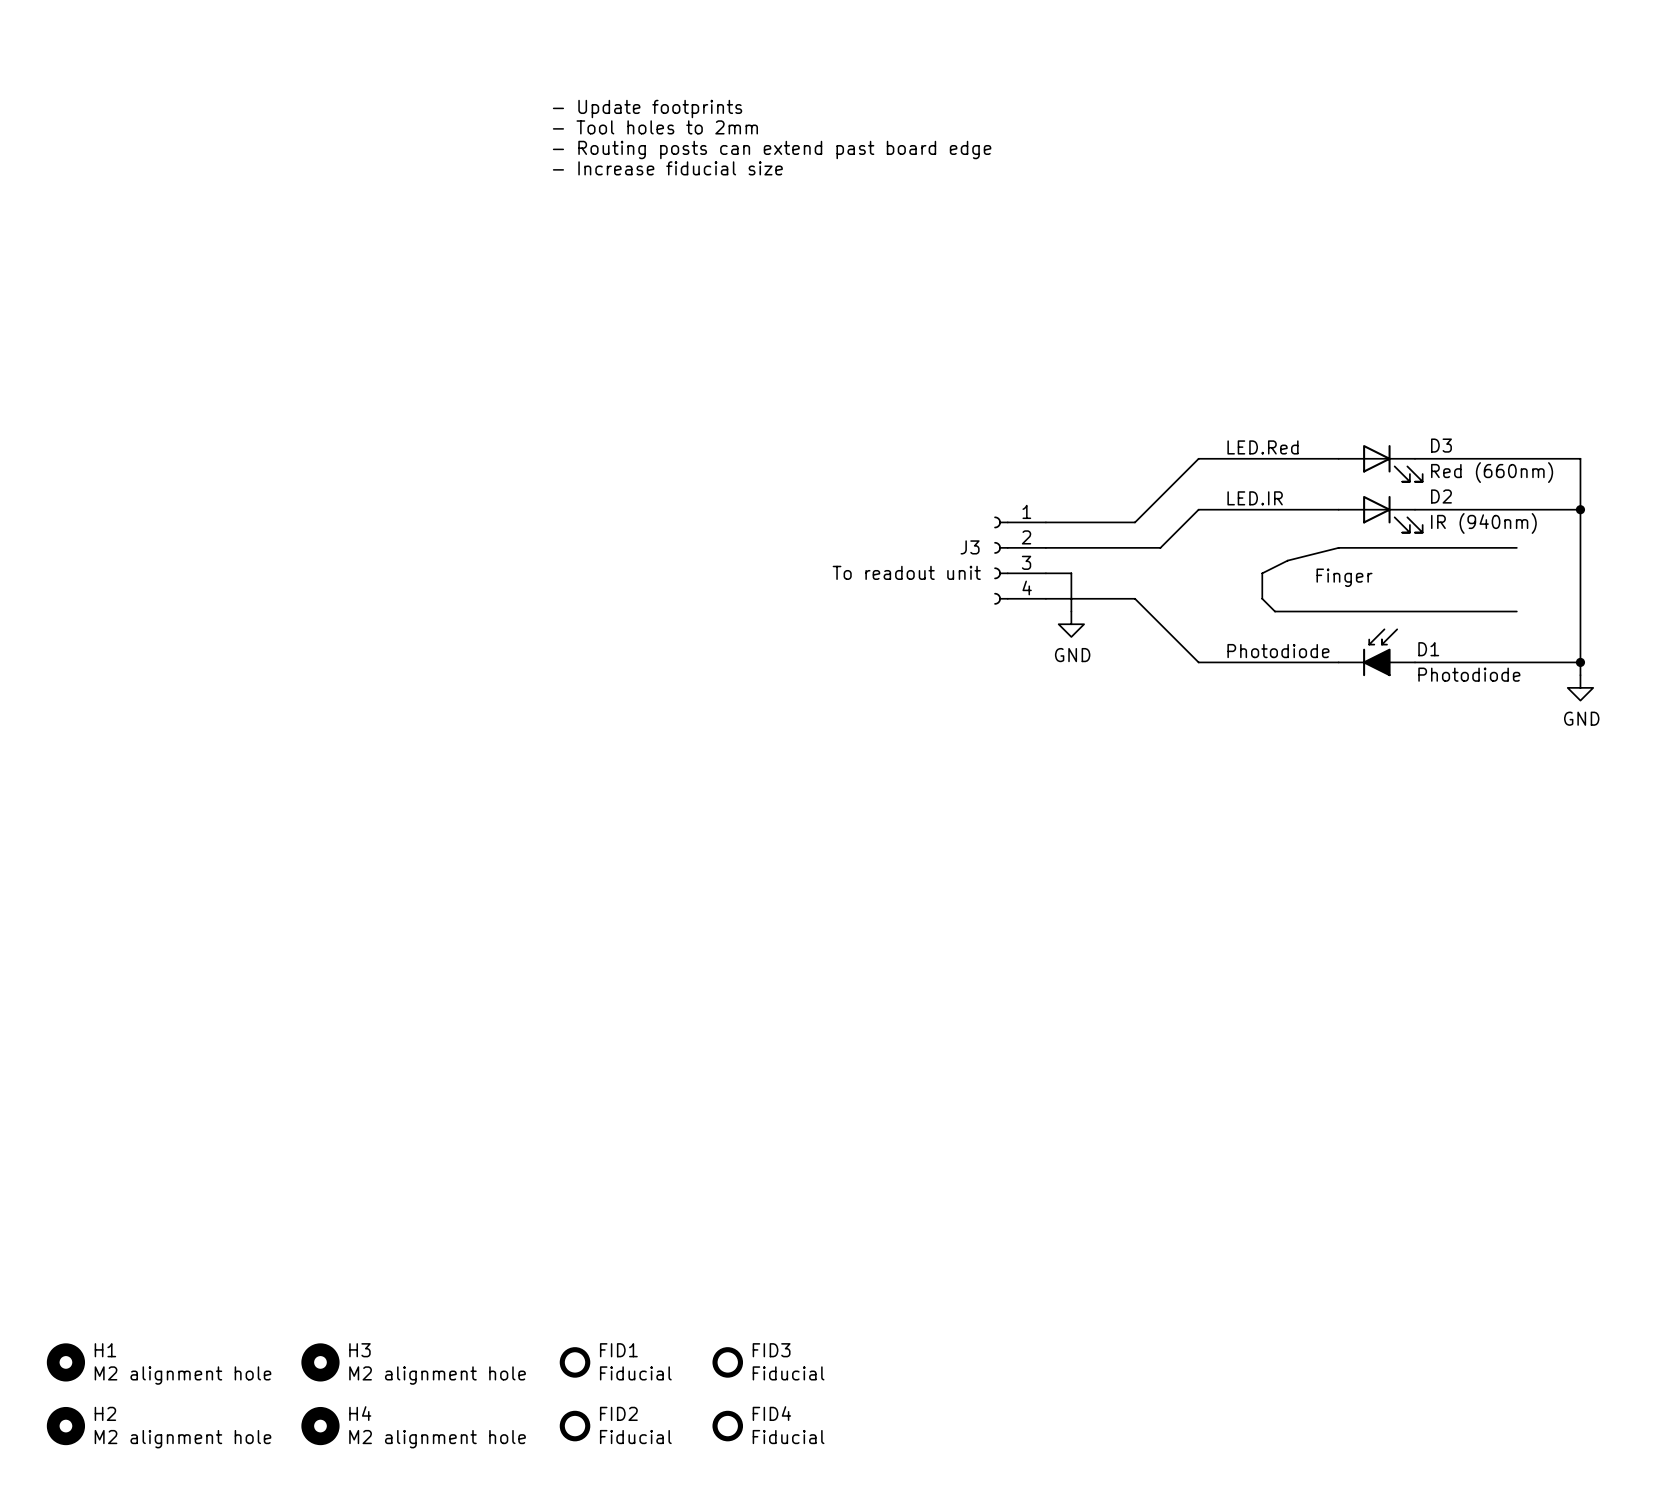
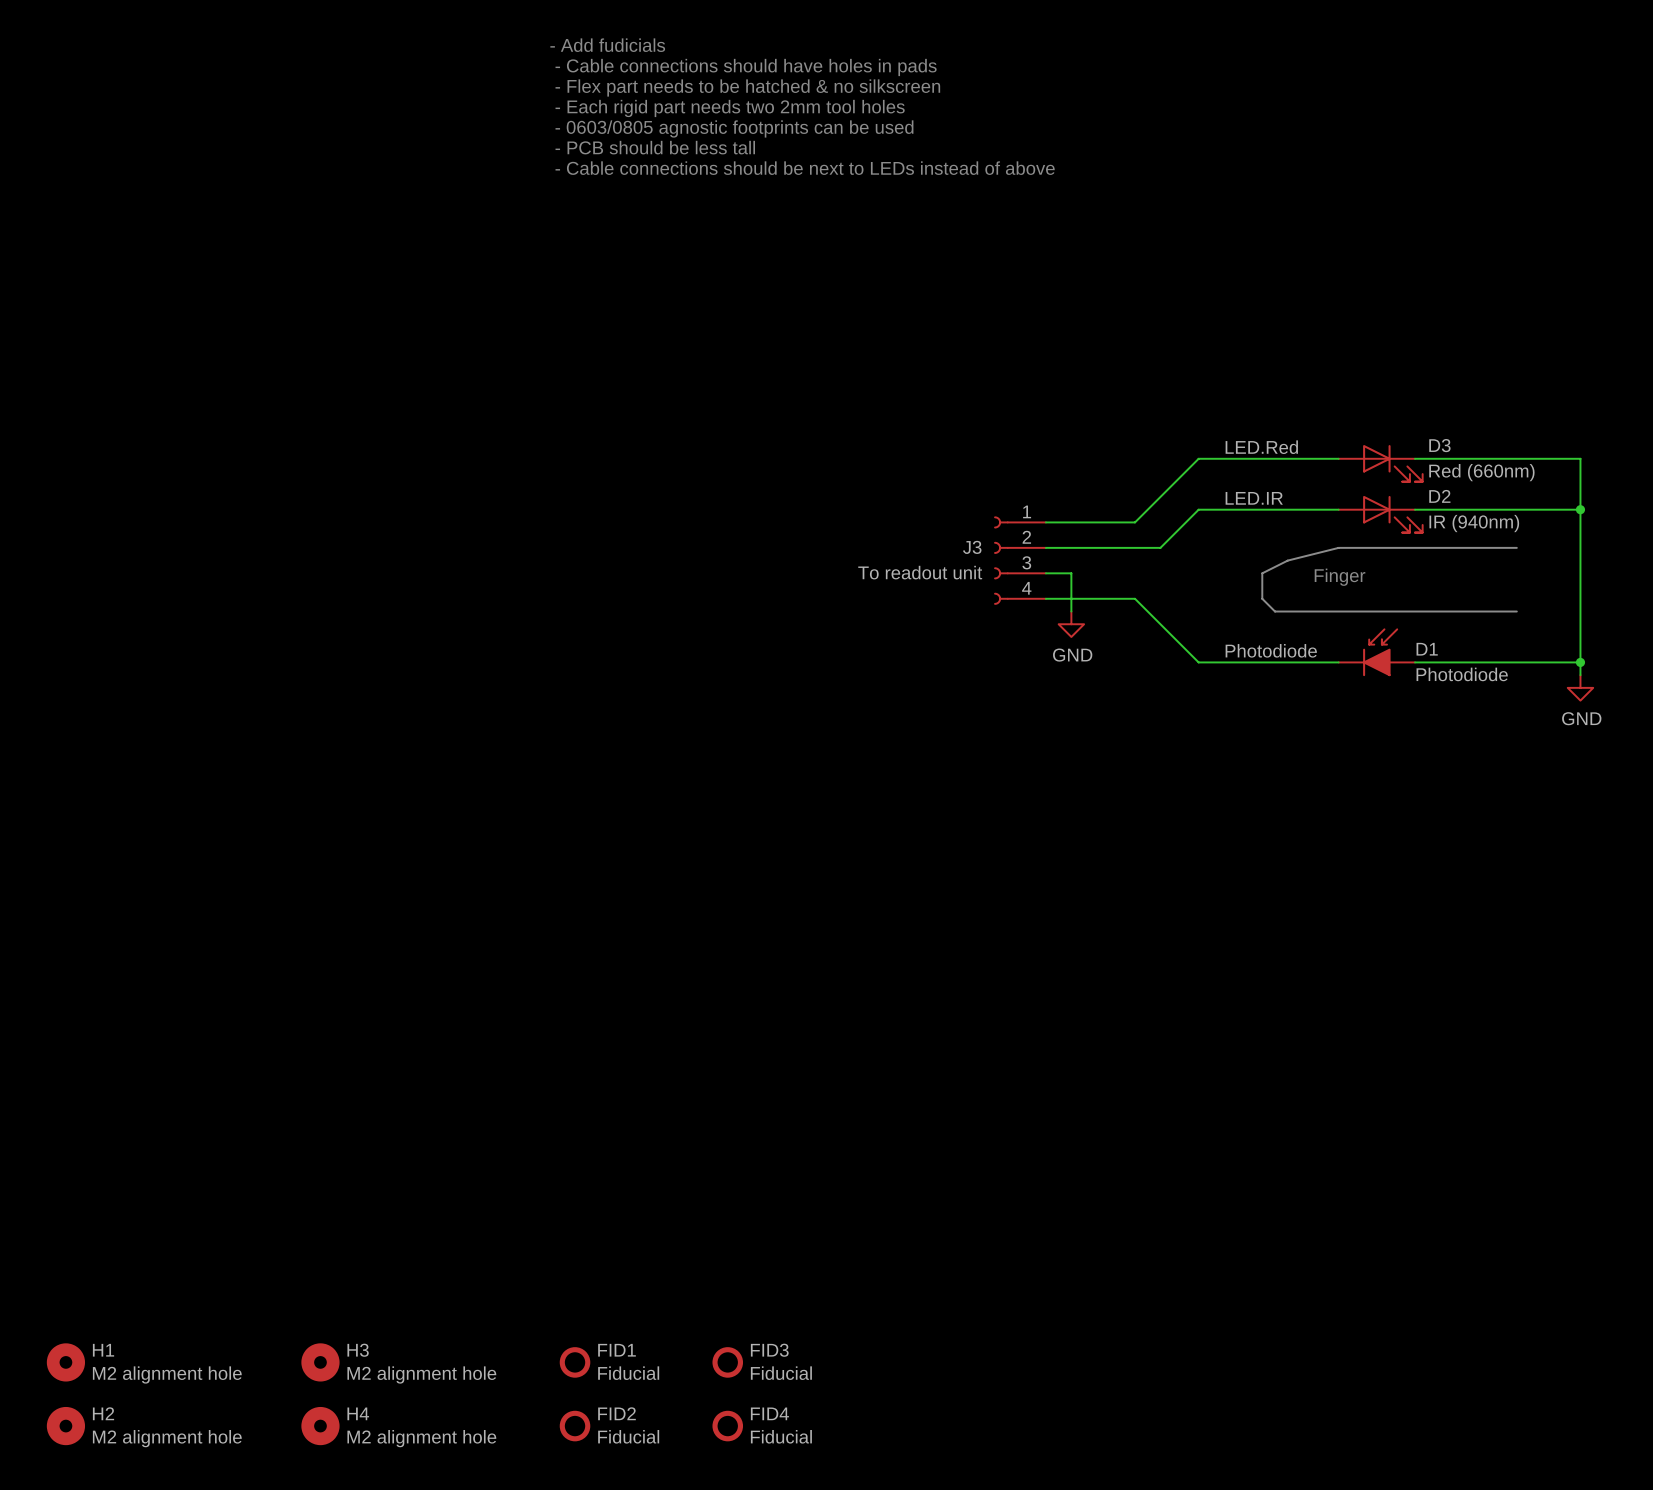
text: none -> - Add fudicials (607, 45)
text: none -> - Cable connections should have holes in pads (746, 67)
text: none -> - Flex part needs to be hatched & no silkscreen (747, 87)
text: - Update footprints (647, 109) -> - Each rigid part needs two 2mm tool holes (730, 108)
text: - Tool holes to 2mm (655, 127) -> - 0603/0805 agnostic footprints can be used (734, 128)
text: - Routing posts can extend past board edge (772, 149) -> - PCB should be less tall (655, 147)
text: - Increase fiducial size (667, 168) -> - Cable connections should be next to LEDs instead of above (805, 168)

